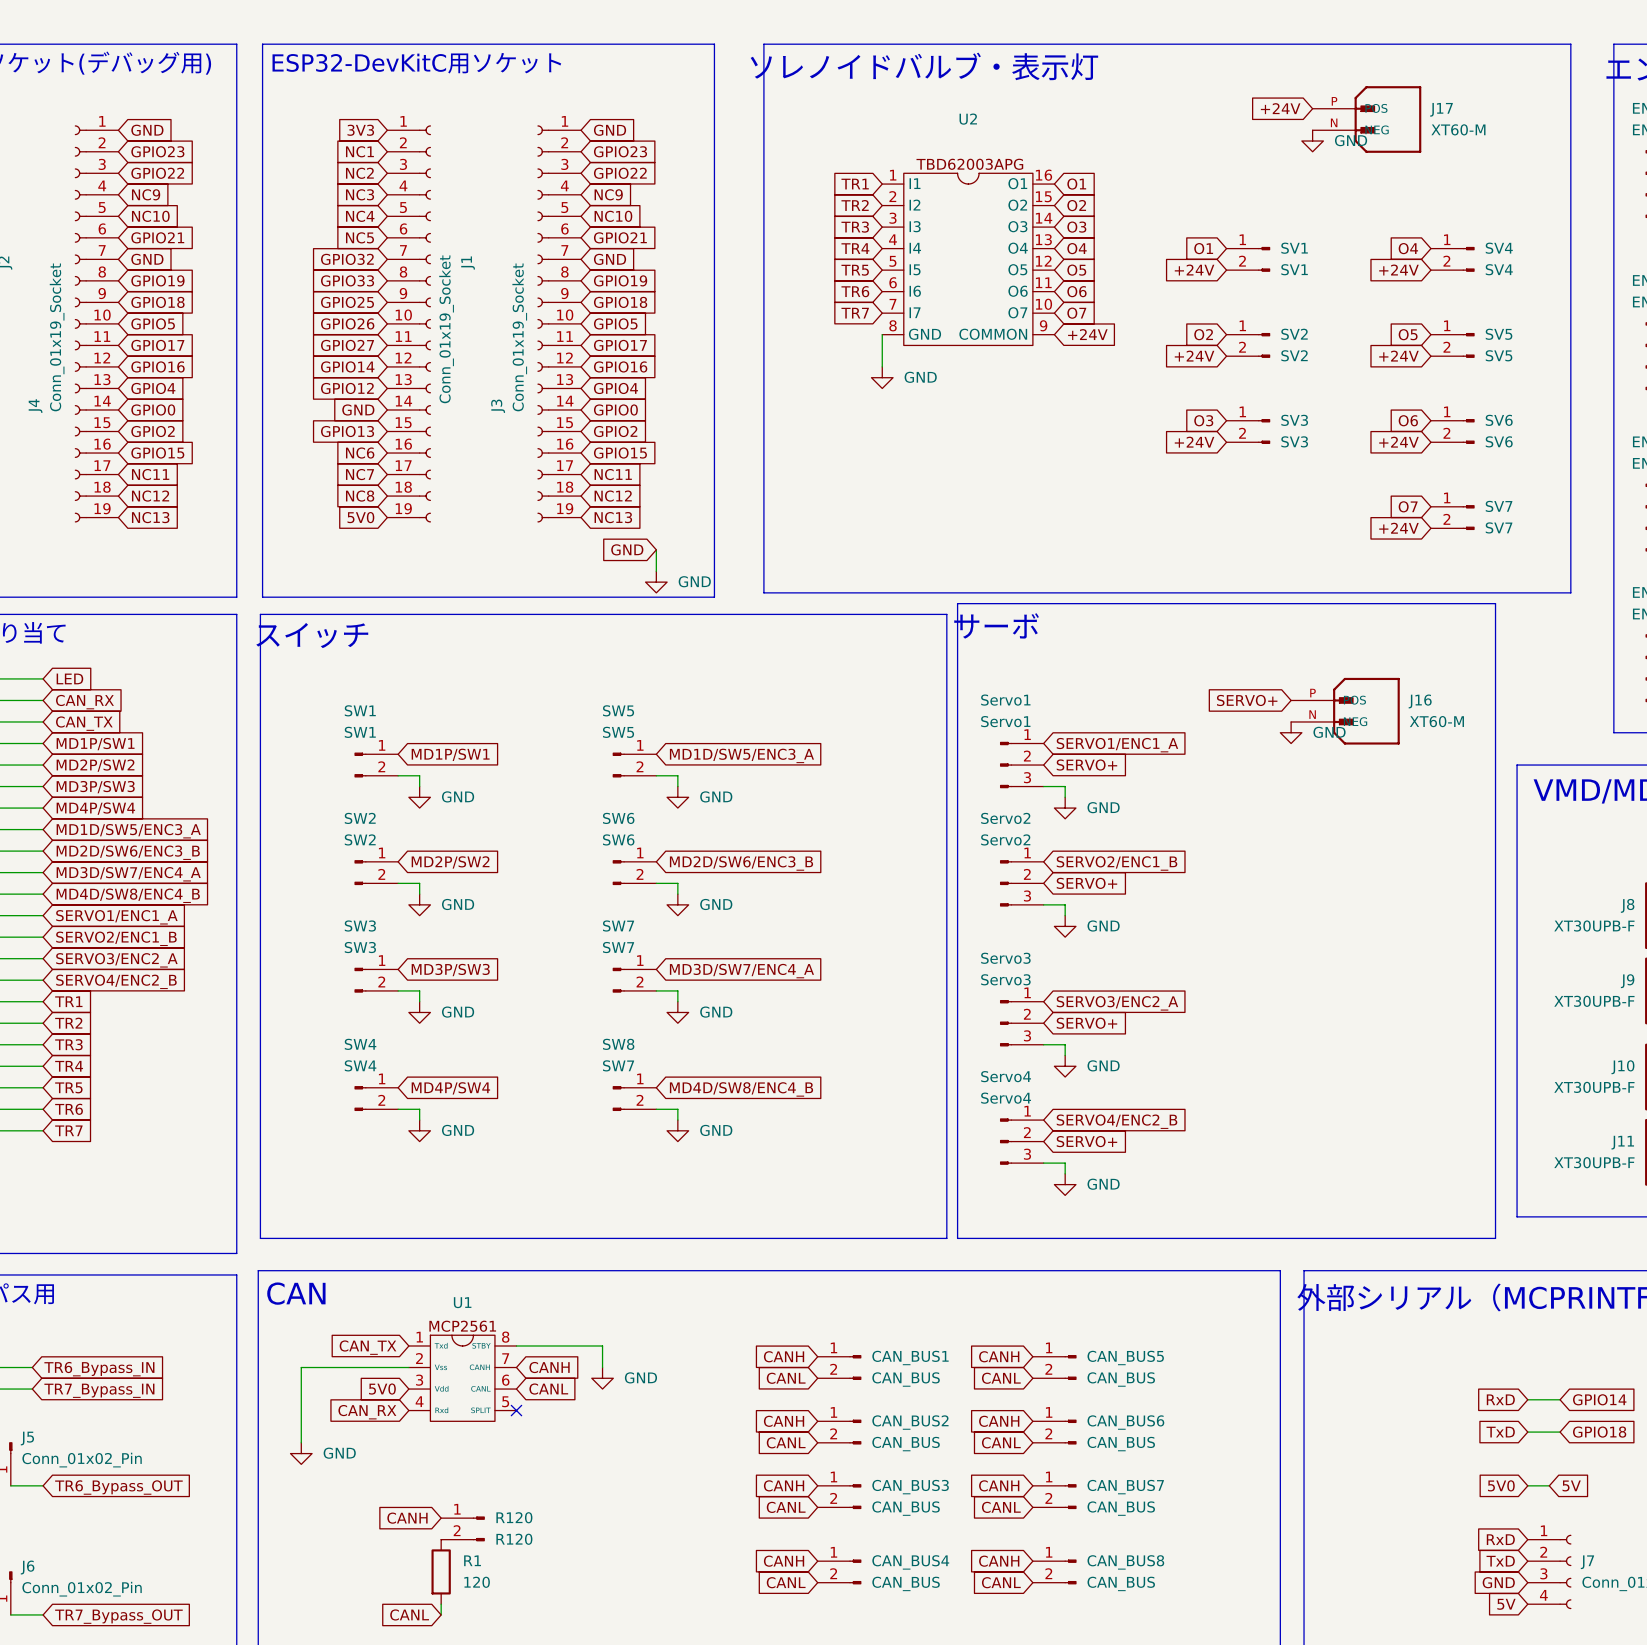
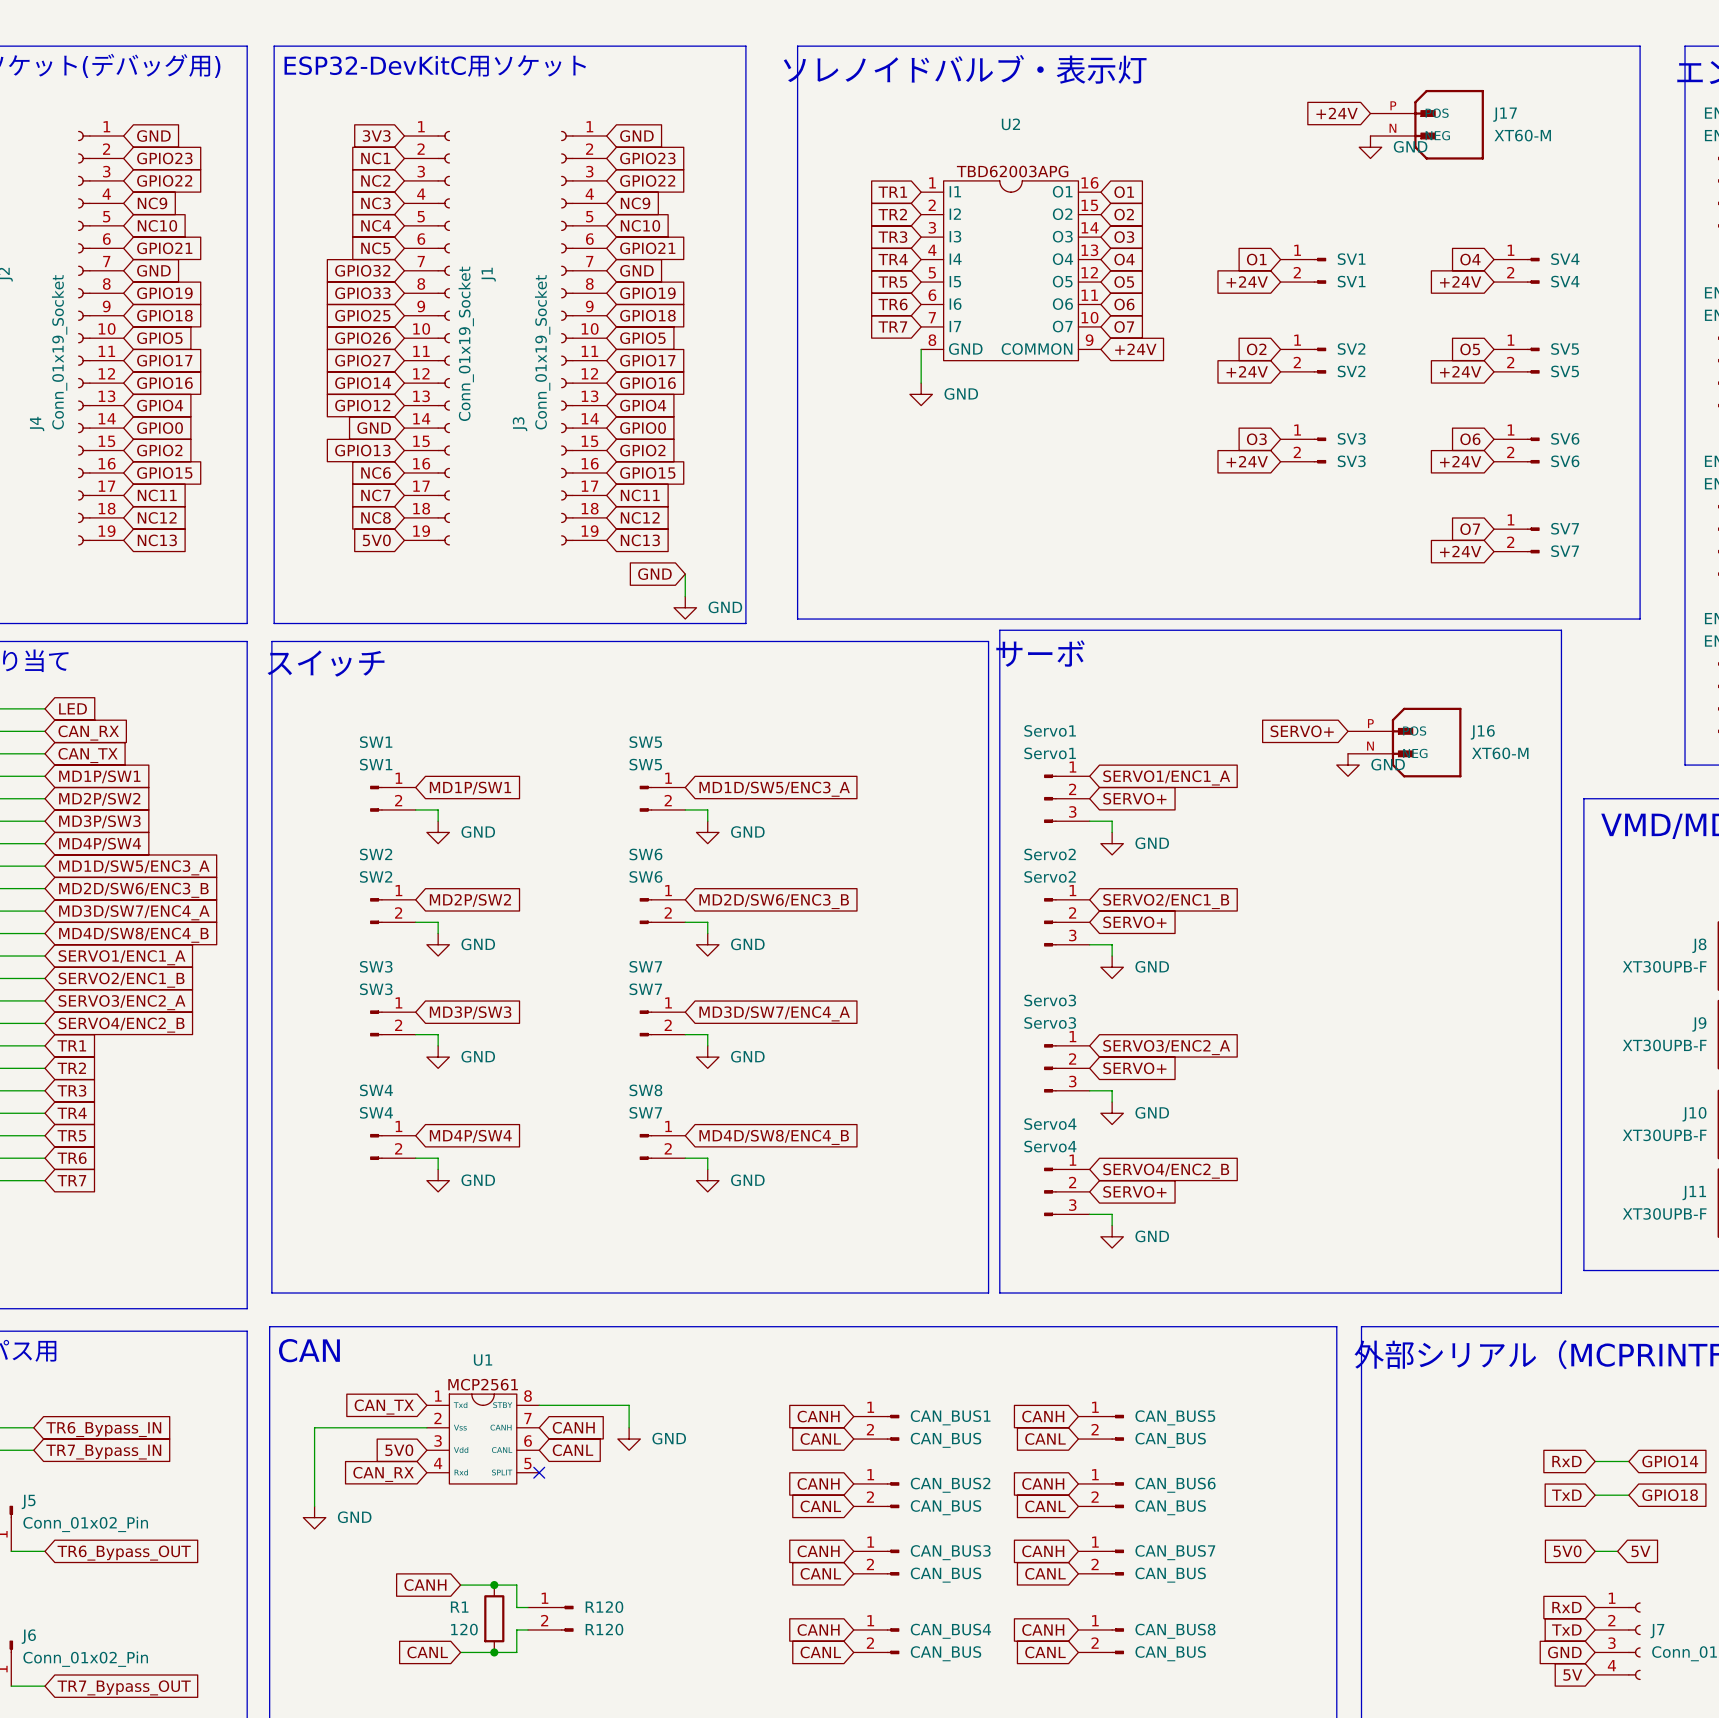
wire: none -> (460, 1585) (516, 1585) (516, 1607) (528, 1607)
junction: none -> (494, 1585)
R120 position: (463, 1528) -> (550, 1618)
R1 name position: R1 (472, 1560) -> R1 (459, 1607)
wire: none -> (528, 1629) (516, 1629) (516, 1652) (460, 1652)
R1 position: (441, 1571) -> (494, 1618)
junction: none -> (494, 1652)
R1 value position: 120 (477, 1582) -> 120 (464, 1629)
wire: (441, 1604) (441, 1614) -> none
global label position: CANL (409, 1614) -> CANL (427, 1652)

